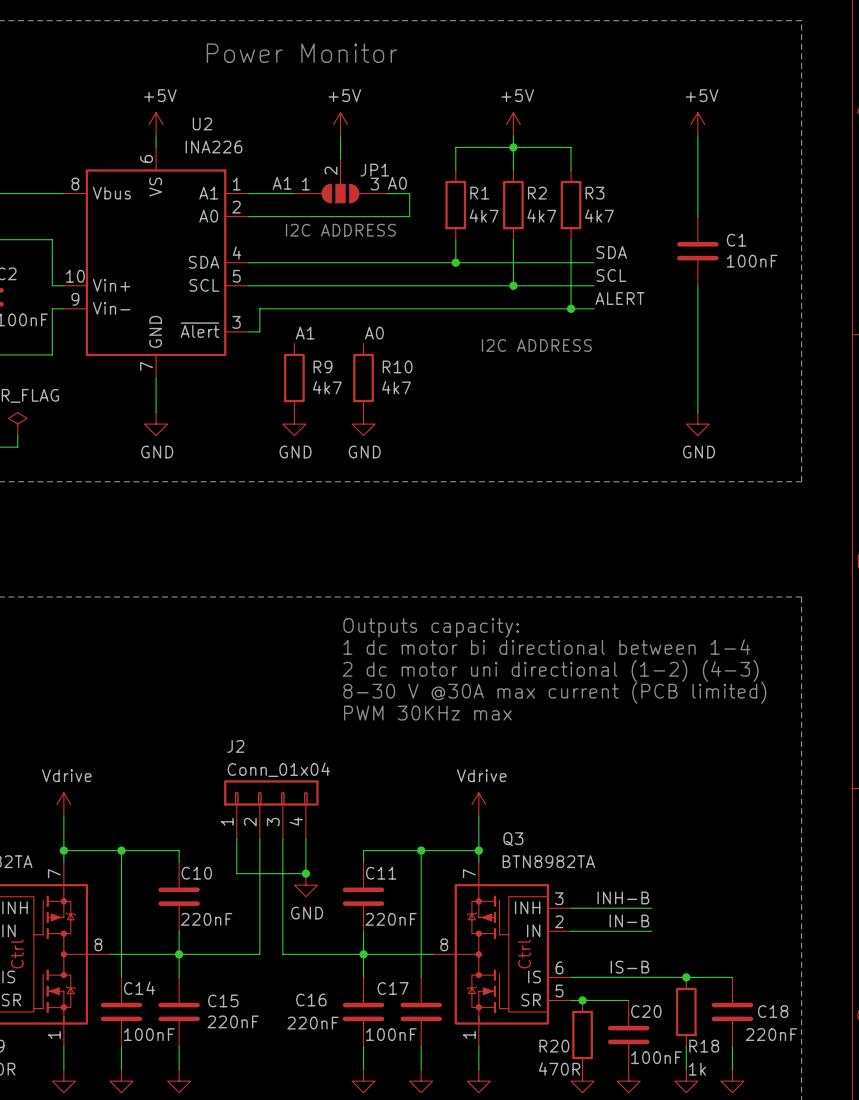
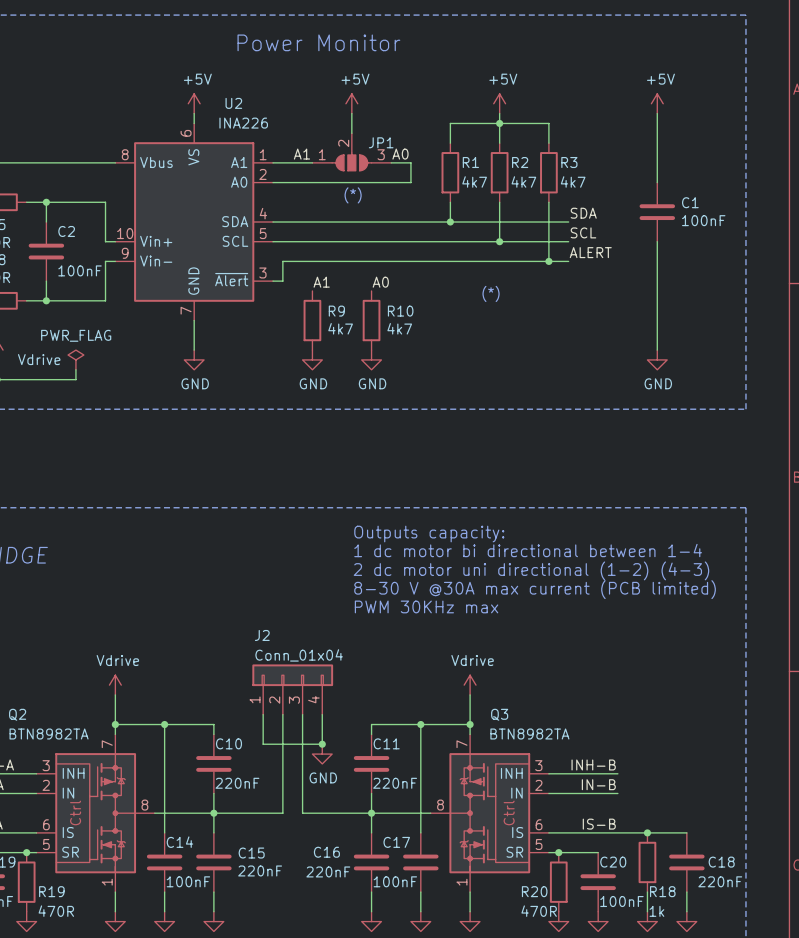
text: I2C ADDRESS (340, 230) -> none
text: none -> (*) (353, 195)
text: I2C ADDRESS (536, 345) -> none
text: none -> (*) (491, 293)

